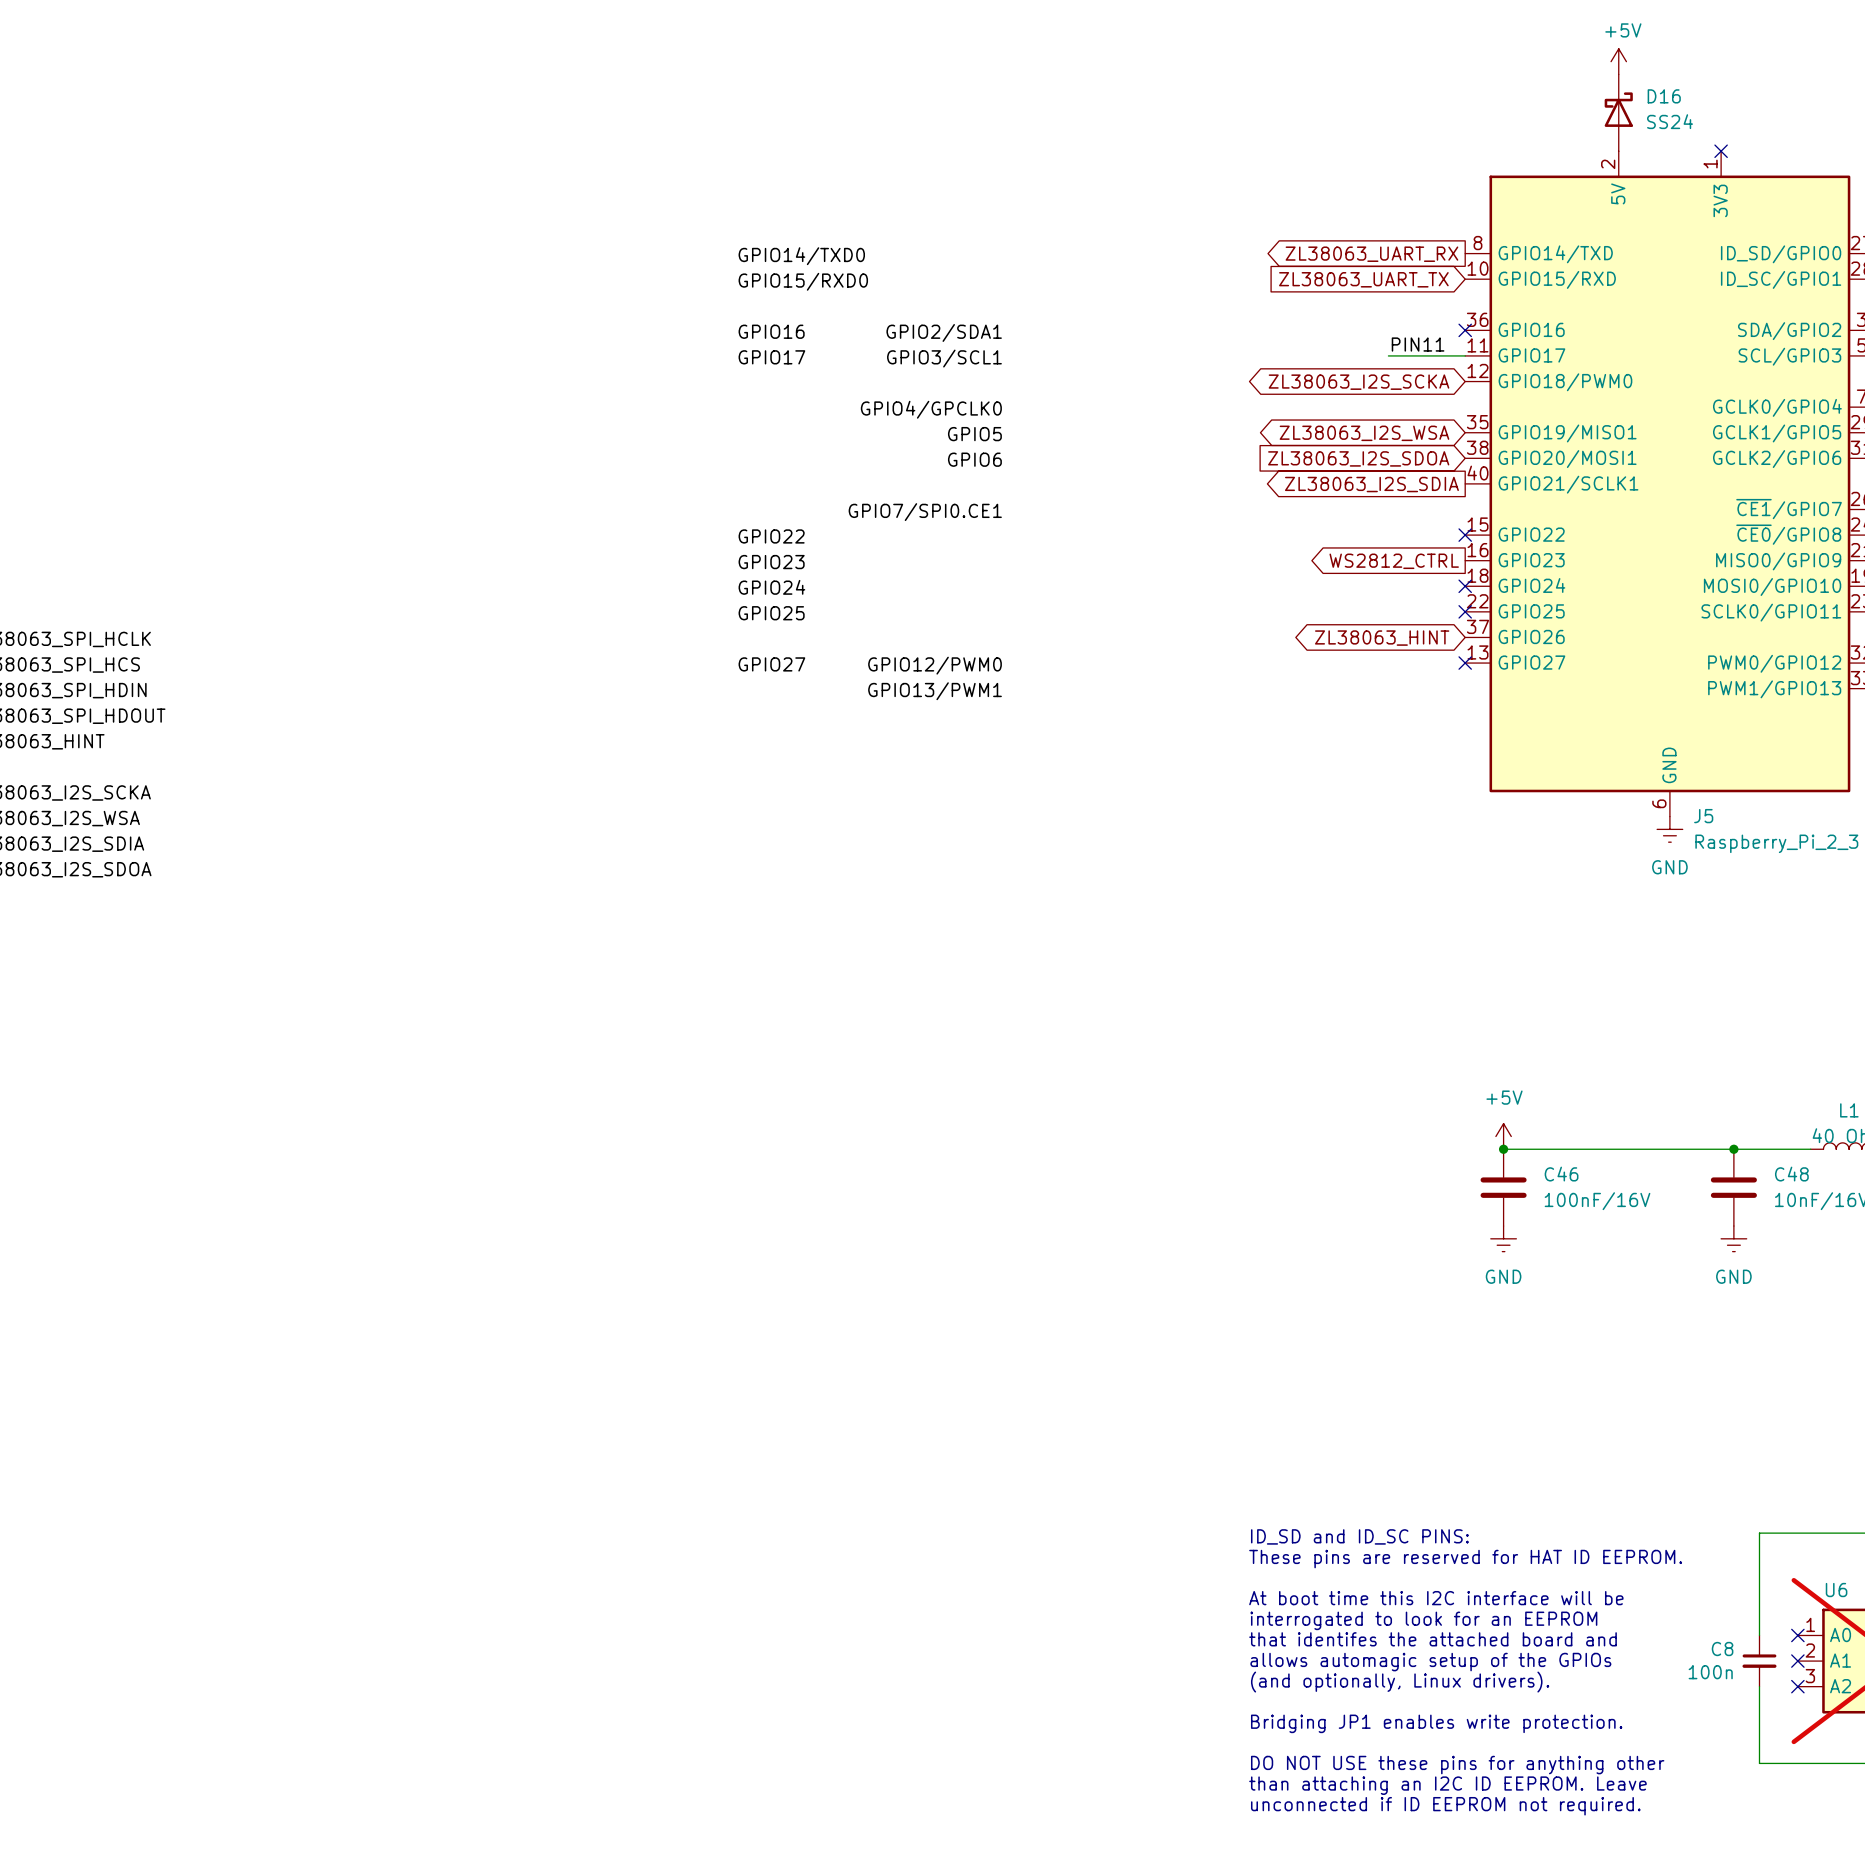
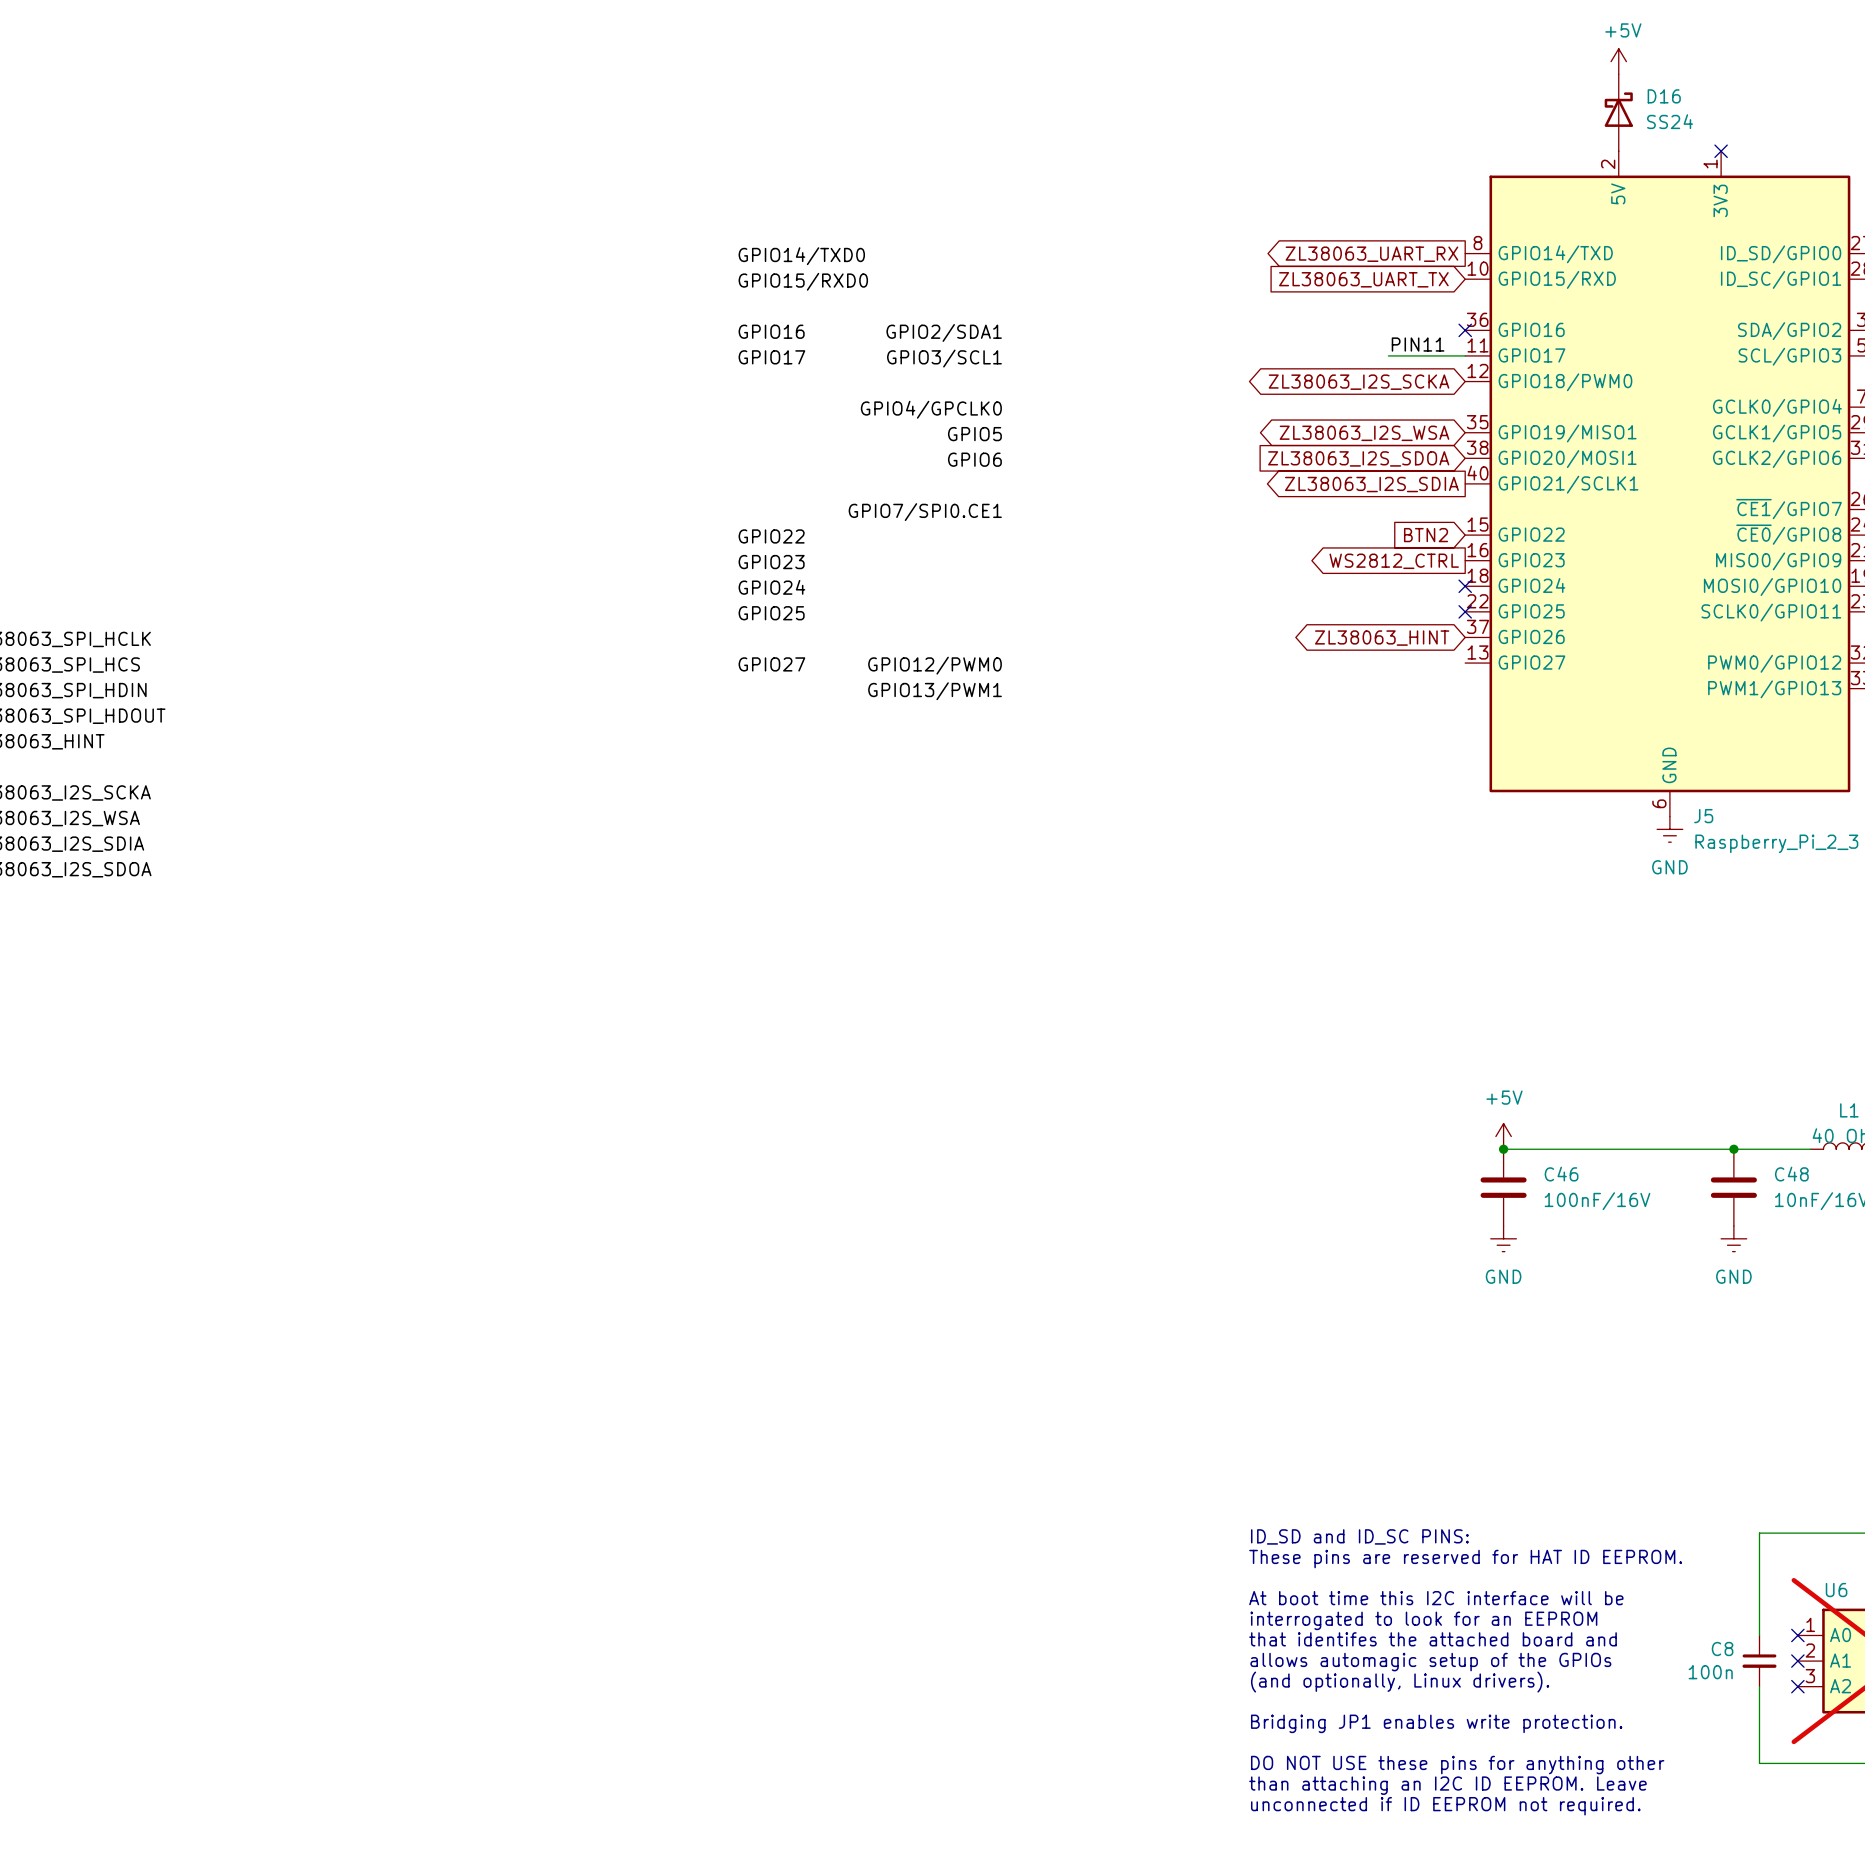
global label: none -> BTN2 (1426, 535)
no-connect mark: (1465, 535) -> none
no-connect mark: (1465, 663) -> none

